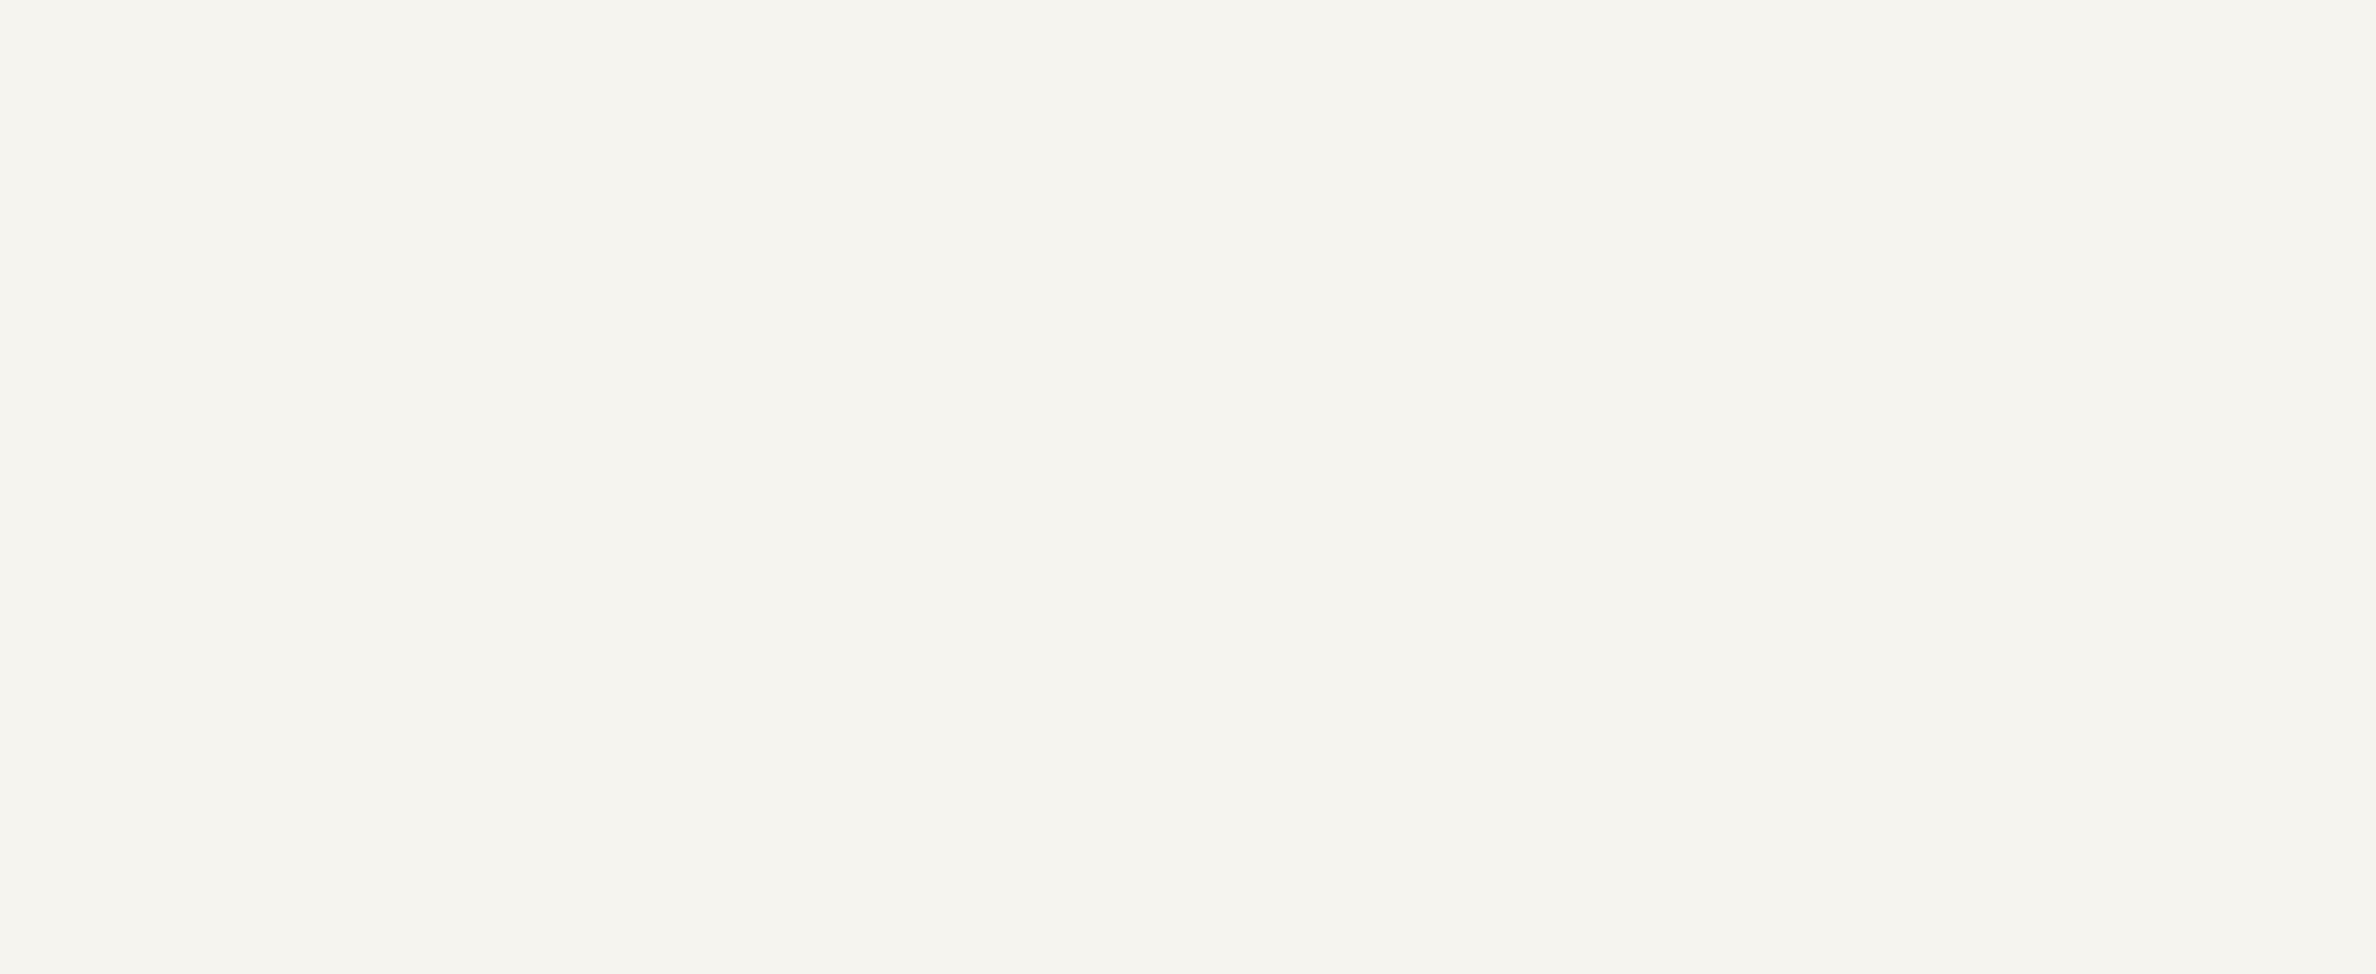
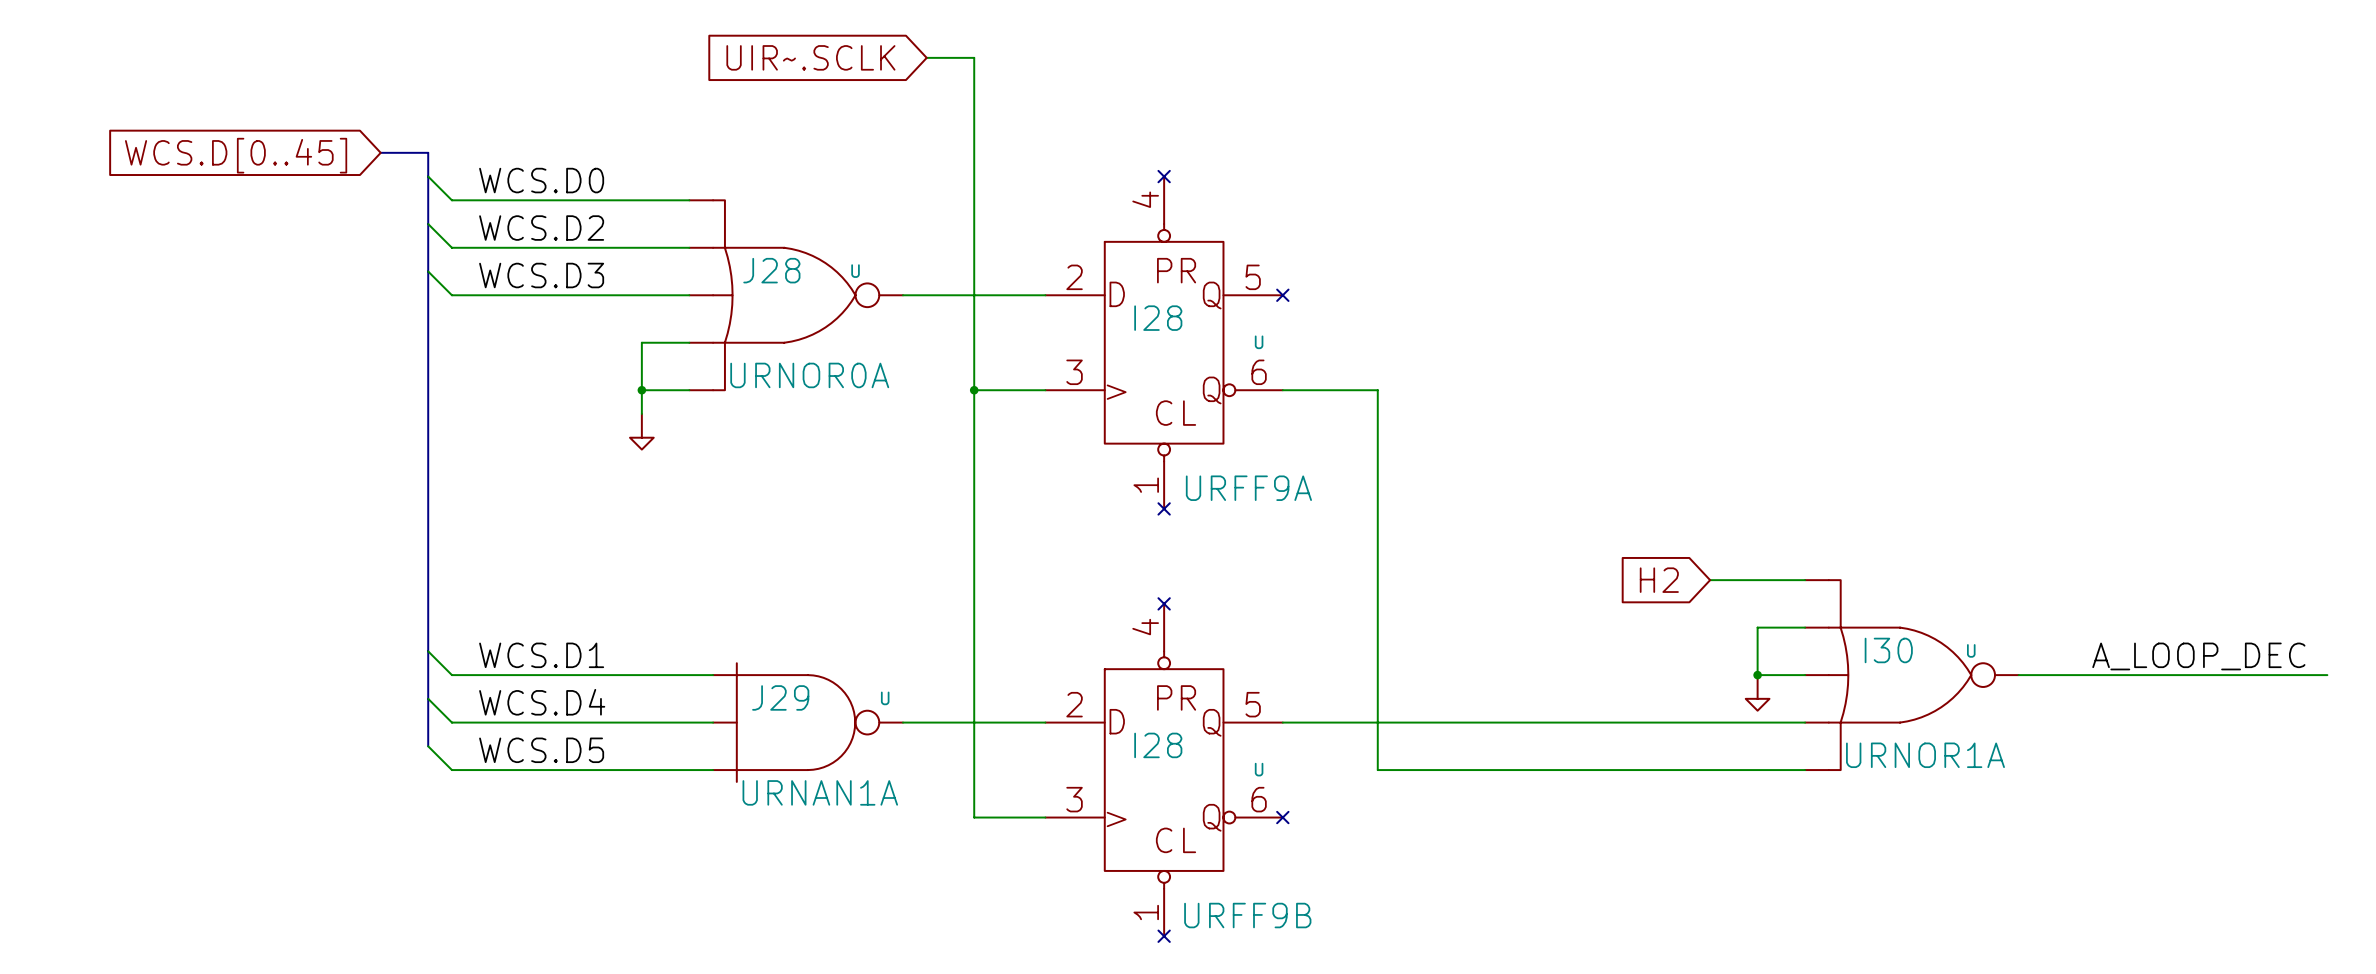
global label: none -> UIR~.SCLK (810, 57)
wire: none -> (926, 57) (974, 57) (974, 817) (1045, 817)
bus: none -> (380, 152) (428, 152) (428, 746)
global label: none -> WCS.D[0..45] (236, 155)
wire: none -> (428, 176) (451, 200) (689, 200)
no-connect mark: none -> (1164, 176)
label: none -> WCS.D0 (541, 180)
wire: none -> (428, 224) (451, 247) (689, 247)
label: none -> WCS.D2 (541, 228)
wire: none -> (428, 271) (451, 295) (689, 295)
label: none -> WCS.D3 (541, 275)
U: none -> (796, 295)
wire: none -> (903, 295) (1045, 295)
no-connect mark: none -> (1282, 295)
wire: none -> (689, 342) (641, 342) (641, 413)
U: none -> (1164, 342)
wire: none -> (641, 390) (689, 390)
junction: none -> (641, 390)
wire: none -> (974, 390) (1045, 390)
junction: none -> (974, 390)
wire: none -> (1282, 390) (1377, 390) (1377, 770) (1805, 770)
power symbol: none -> (641, 432)
no-connect mark: none -> (1164, 508)
global label: none -> H2 (1659, 580)
wire: none -> (1710, 580) (1805, 580)
no-connect mark: none -> (1164, 603)
wire: none -> (1805, 627) (1757, 627) (1757, 675) (1805, 675)
wire: none -> (428, 651) (451, 675) (713, 675)
label: none -> WCS.D1 (541, 655)
label: none -> A_LOOP_DEC (2198, 656)
junction: none -> (1757, 675)
U: none -> (1911, 675)
wire: none -> (2018, 675) (2327, 675)
power symbol: none -> (1757, 693)
wire: none -> (428, 698) (451, 722) (713, 722)
label: none -> WCS.D4 (542, 702)
U: none -> (808, 722)
wire: none -> (903, 722) (1045, 722)
wire: none -> (1282, 722) (1805, 722)
wire: none -> (428, 746) (451, 770) (713, 770)
label: none -> WCS.D5 (541, 750)
U: none -> (1164, 770)
no-connect mark: none -> (1282, 817)
no-connect mark: none -> (1164, 936)

